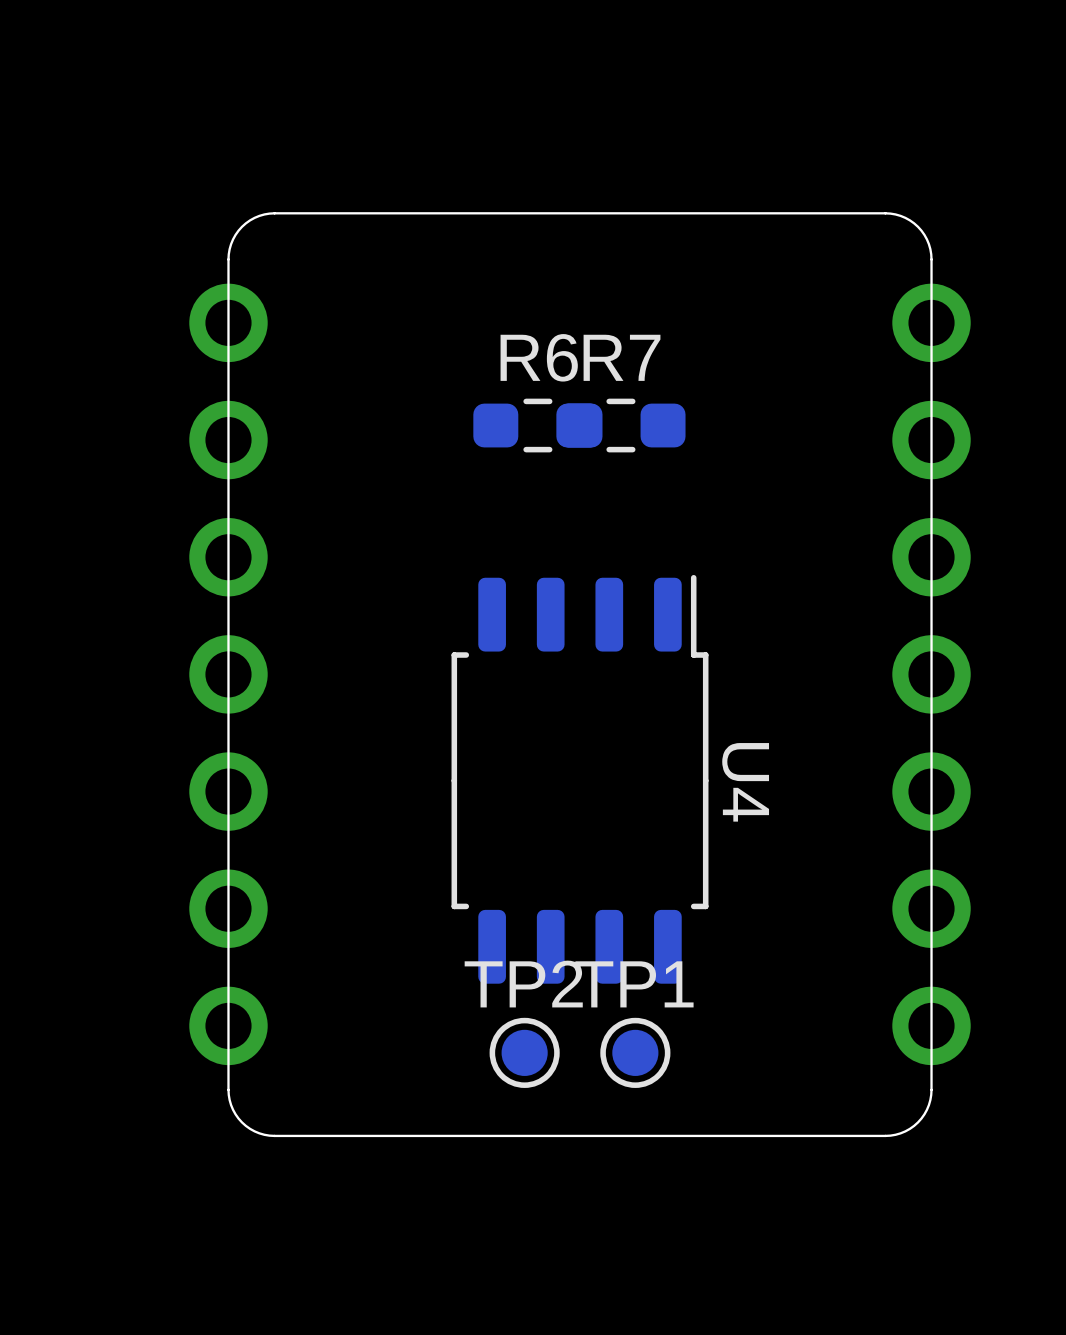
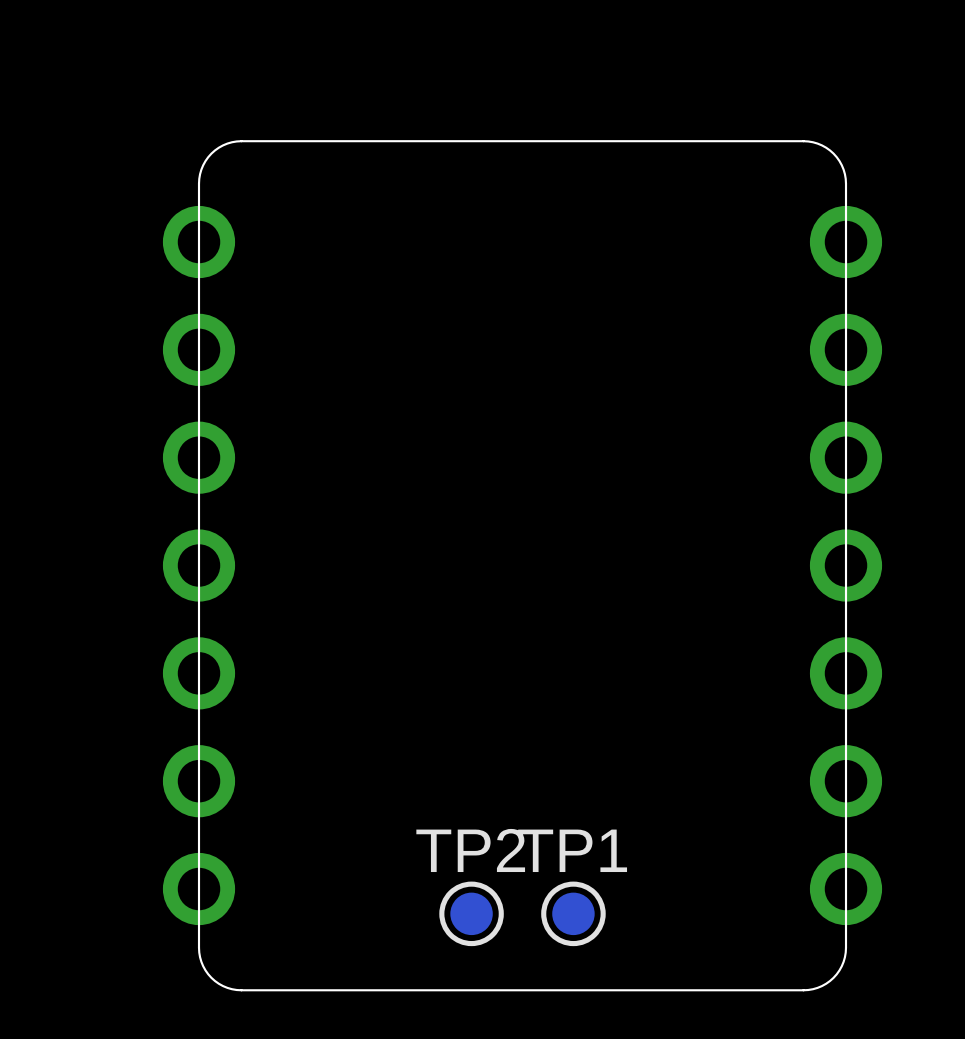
R6: (537, 425) -> none
R7: (620, 425) -> none
U4: (580, 779) -> none

